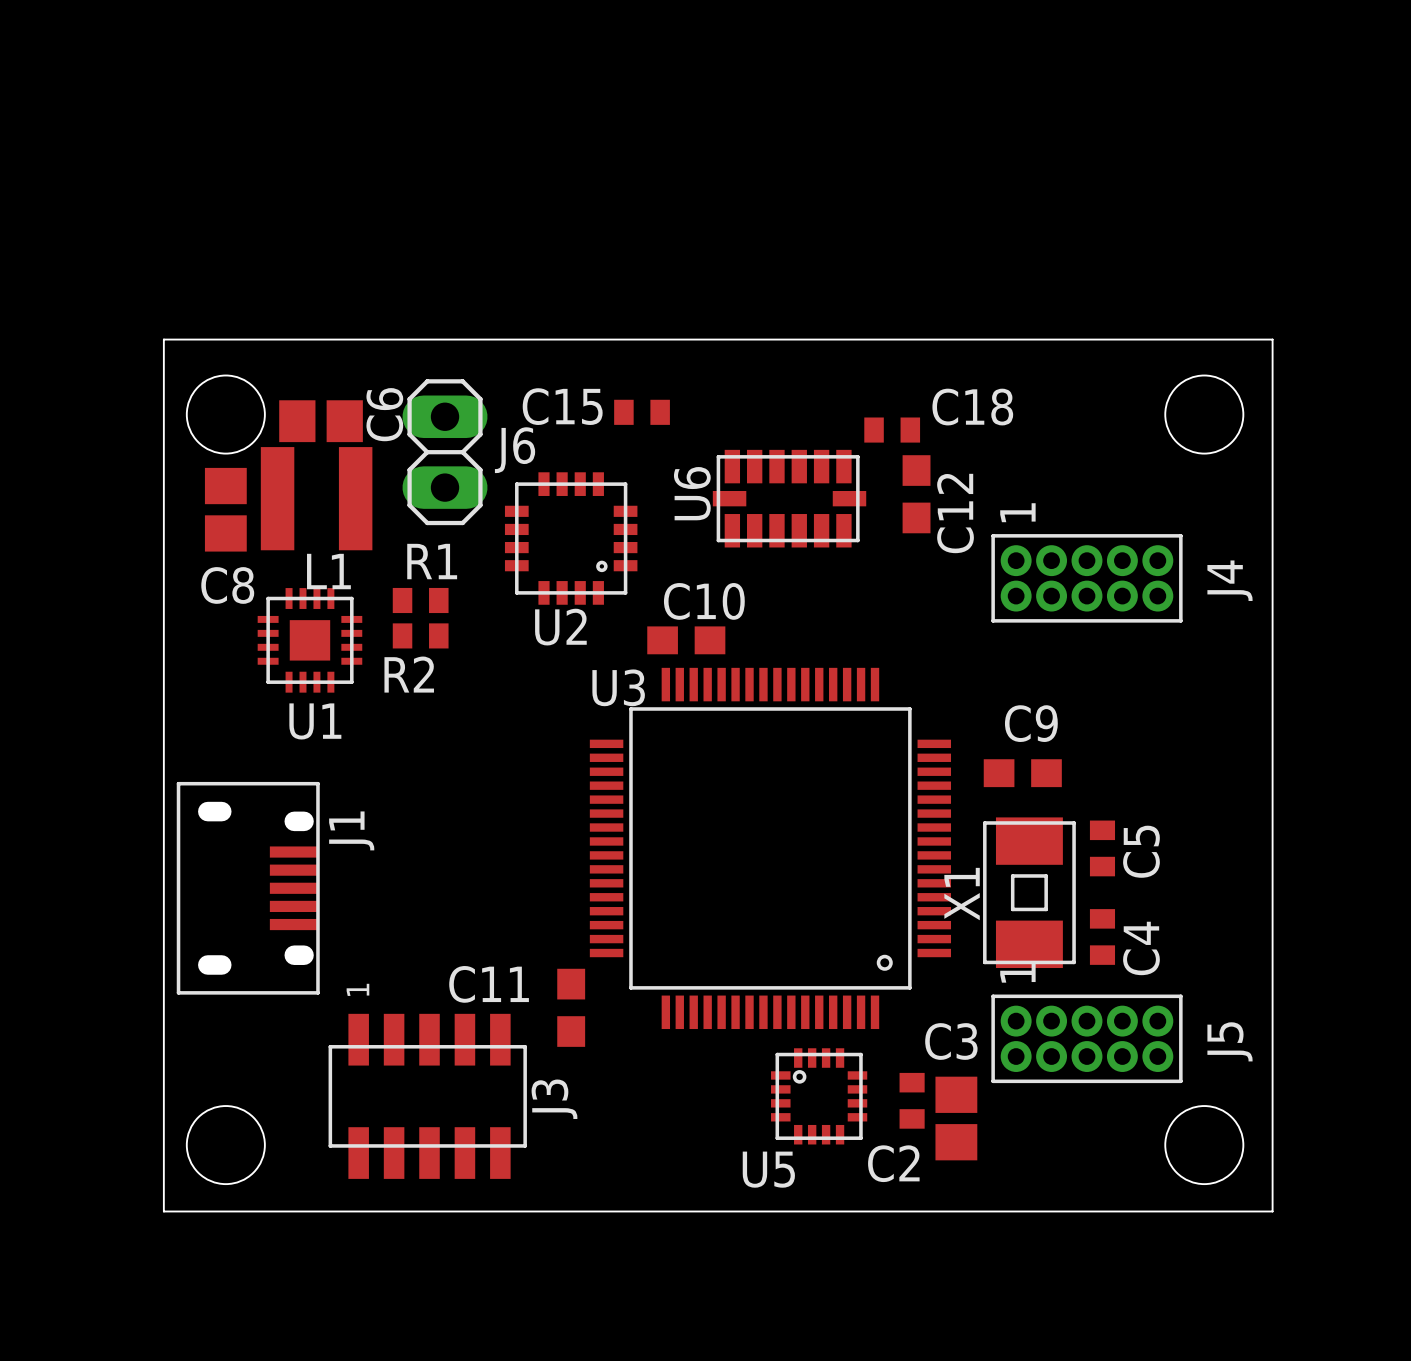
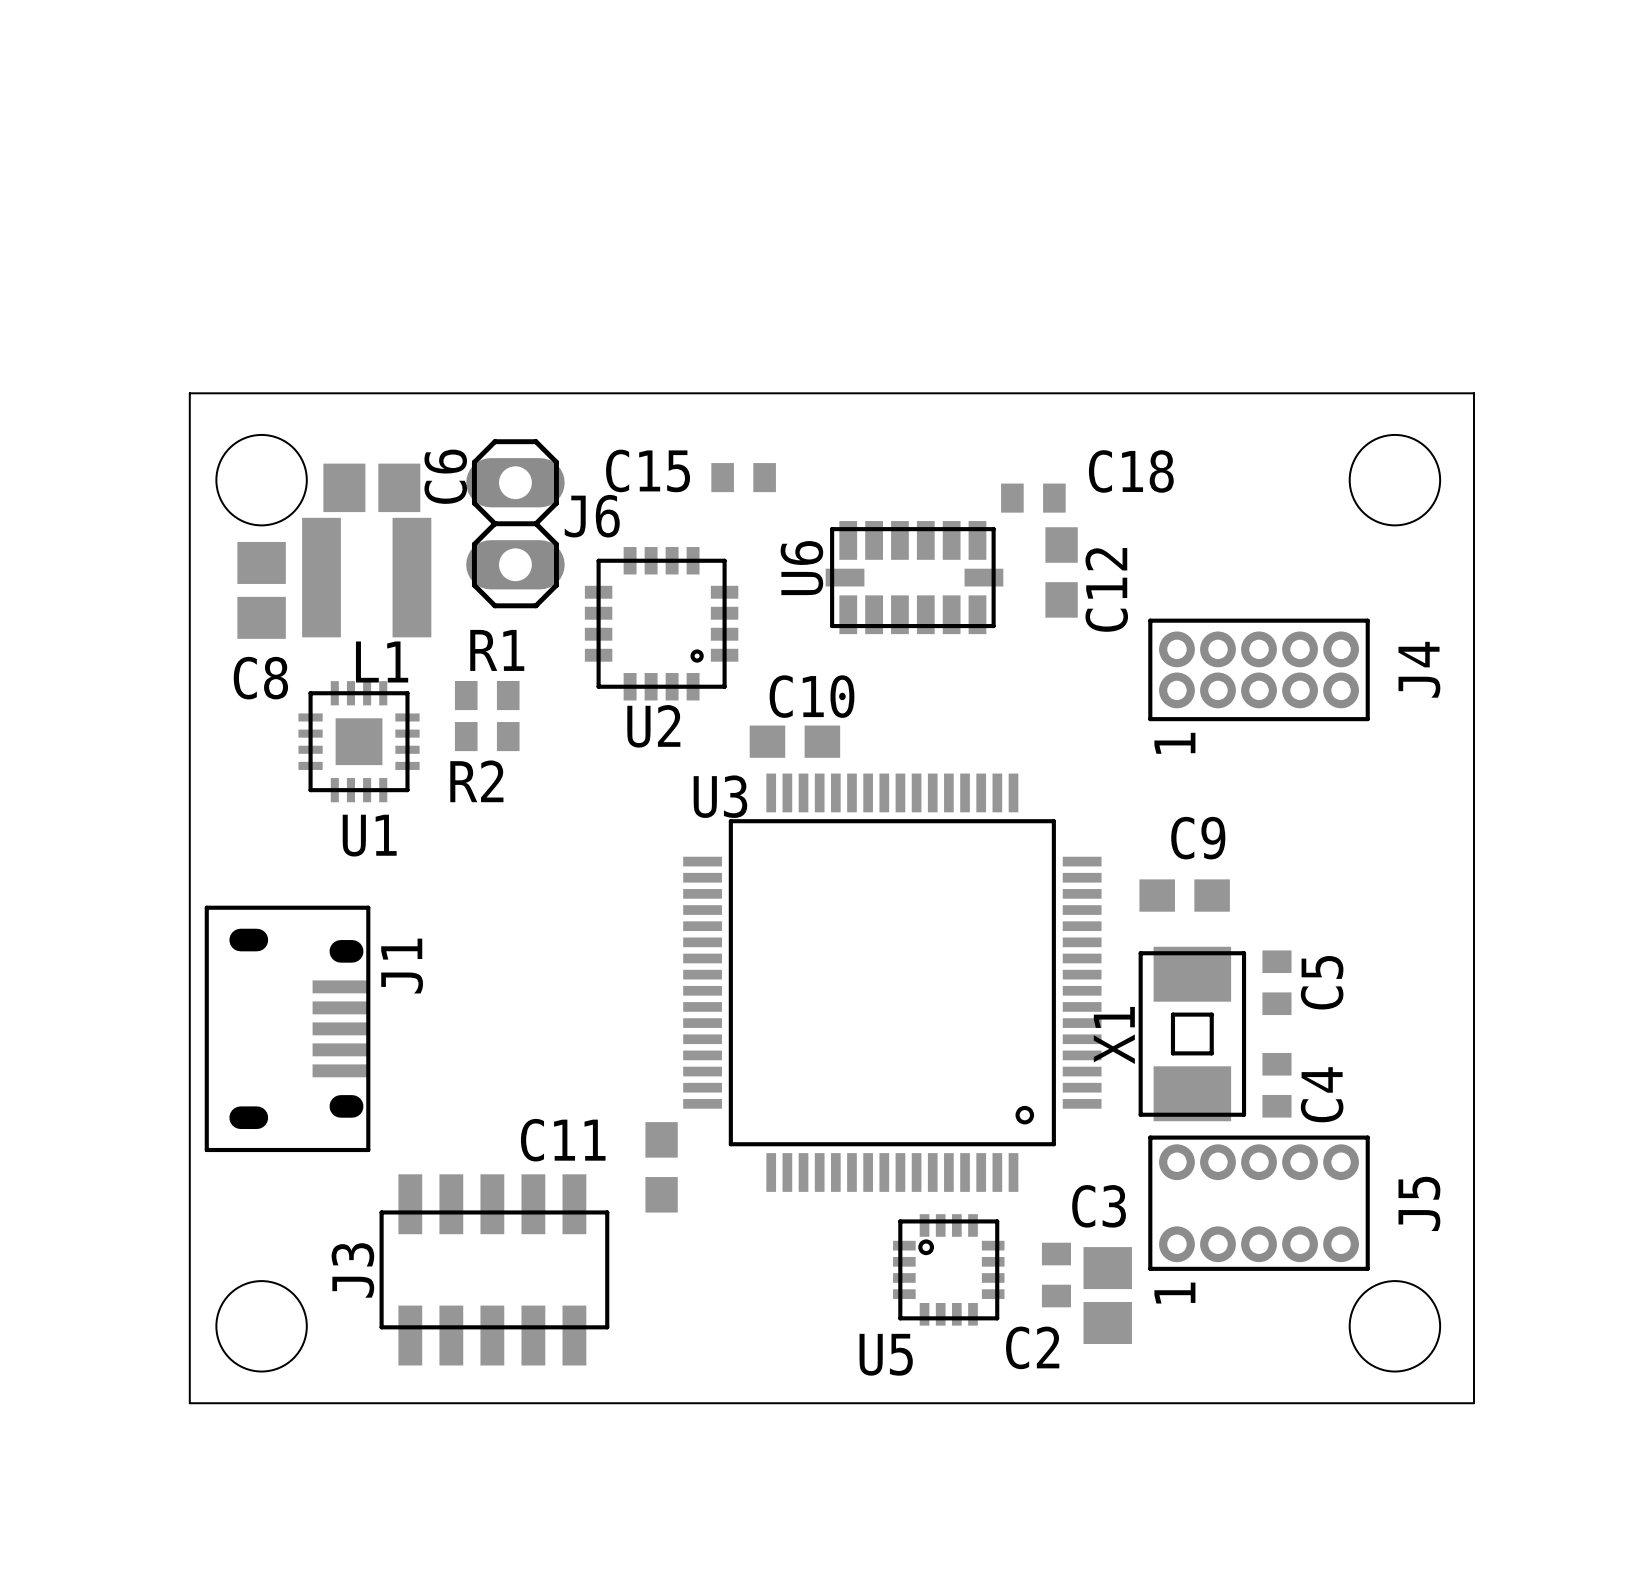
J4 text position: 1 (1017, 512) -> 1 (1174, 743)
J5 footprint: [991, 994, 1183, 1084] -> [1148, 1135, 1370, 1271]
J3 footprint: [328, 1013, 527, 1179] -> [379, 1174, 610, 1366]
J3 name position: J3 (554, 1099) -> J3 (352, 1270)

